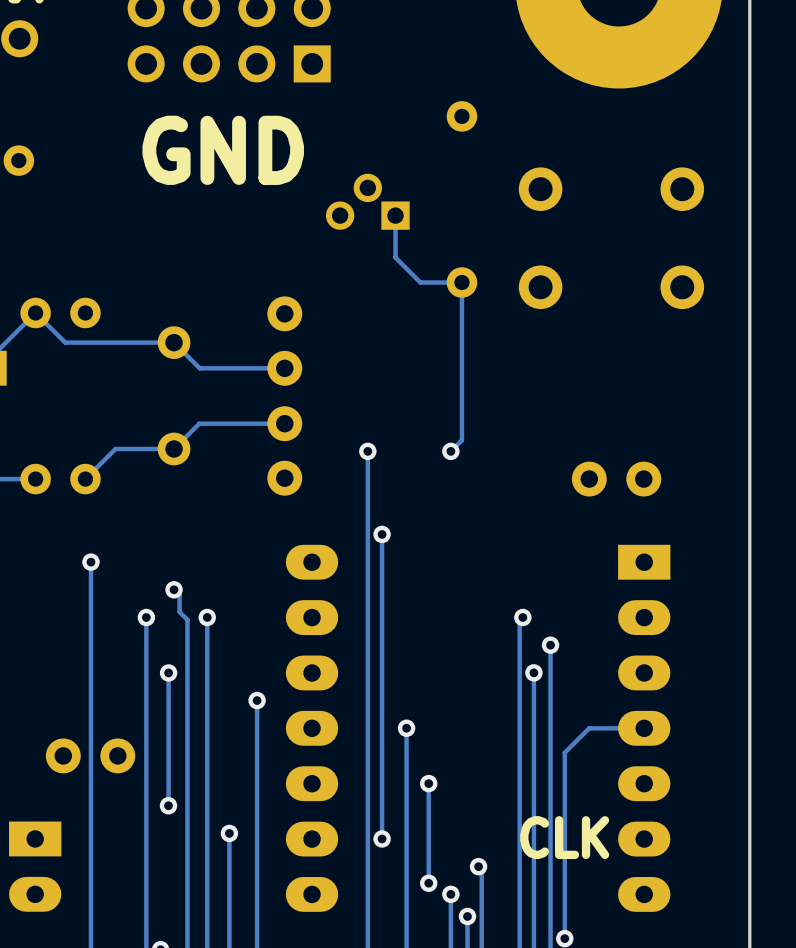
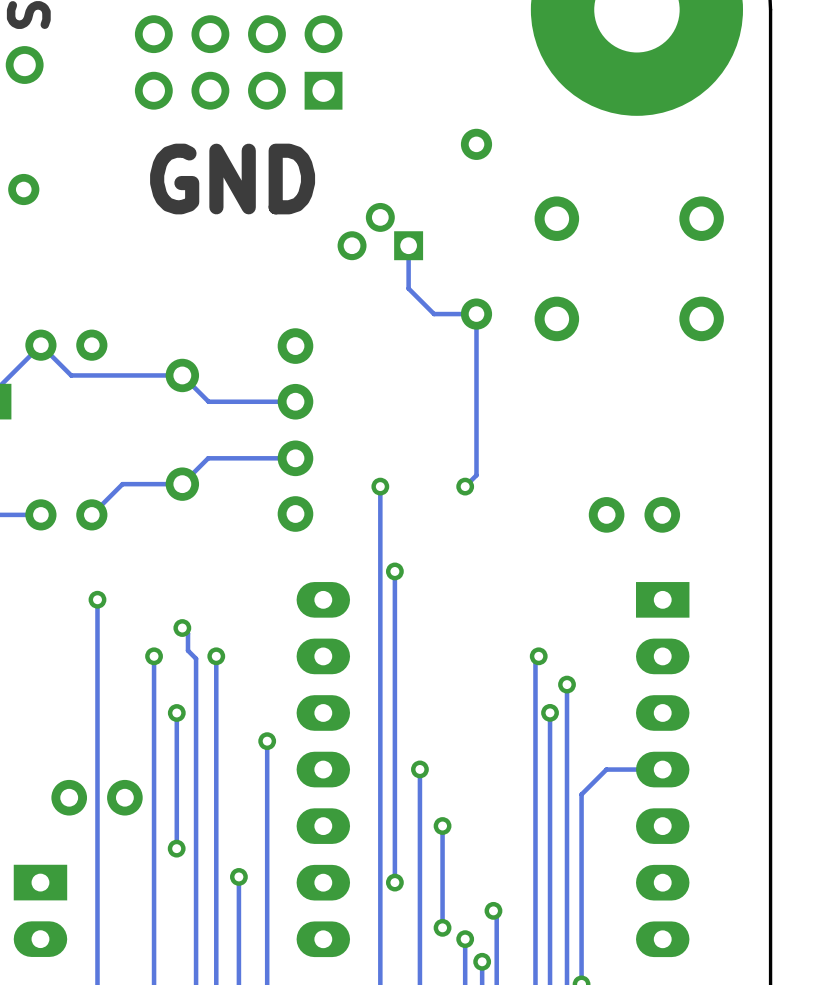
text: CLK (564, 837) -> none

